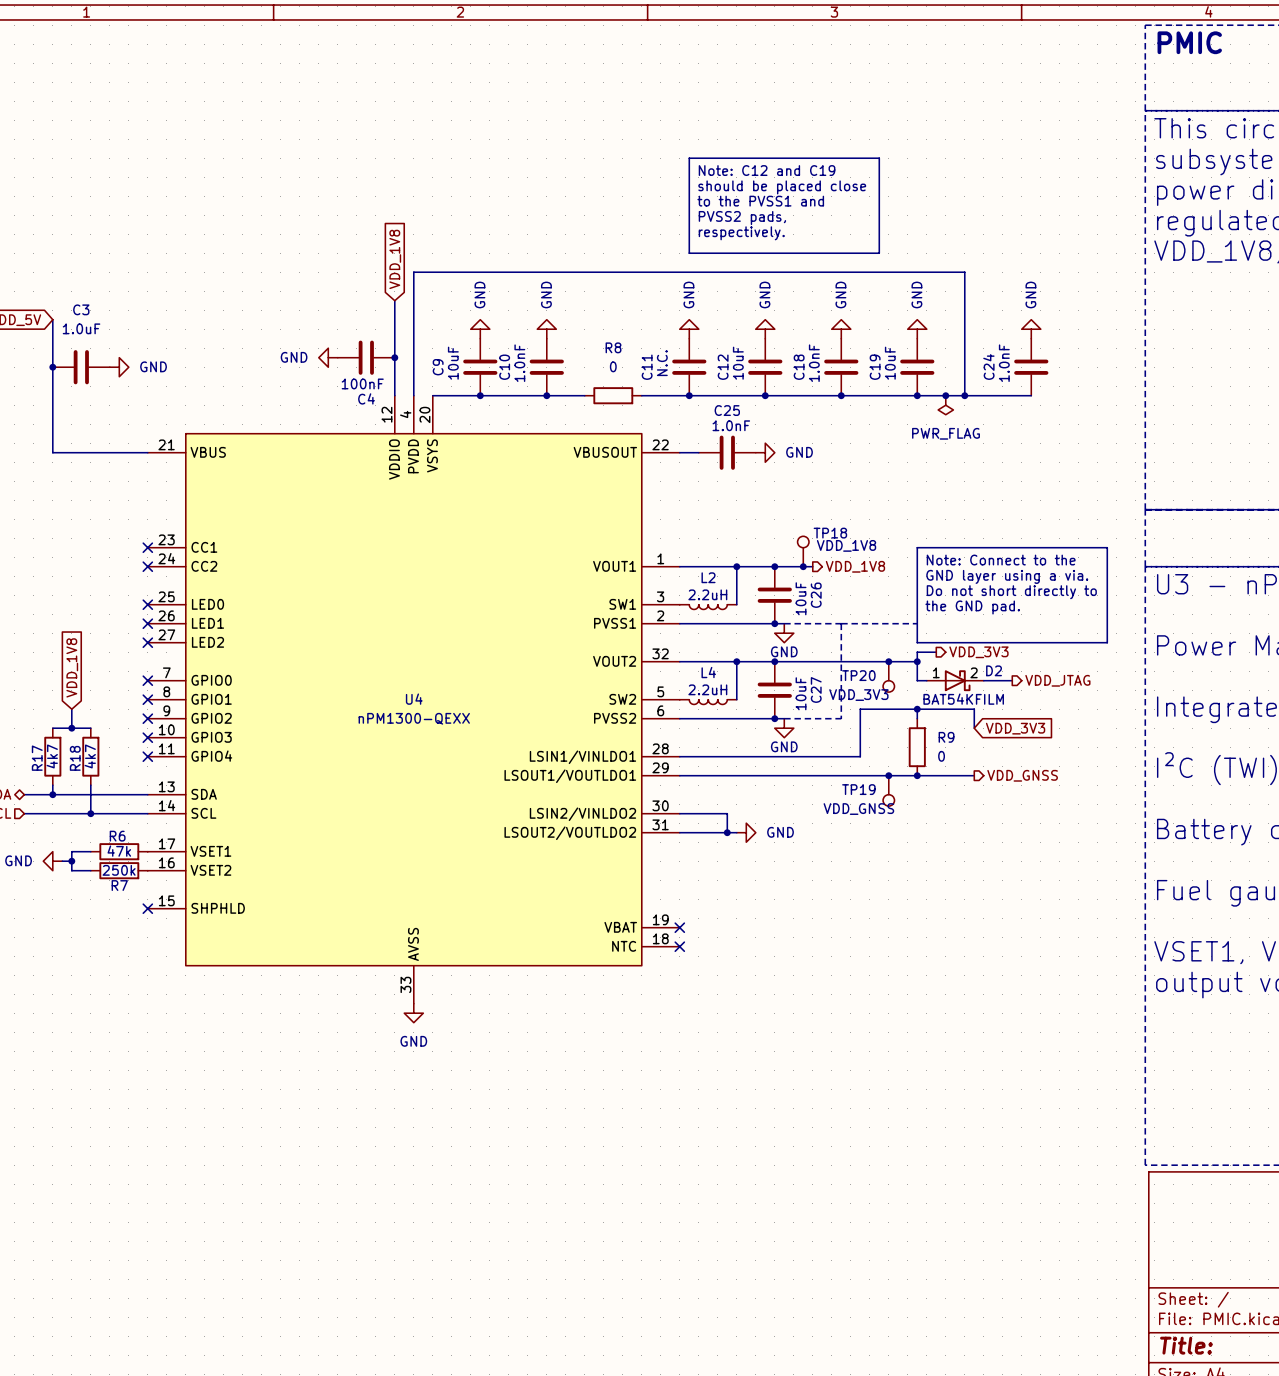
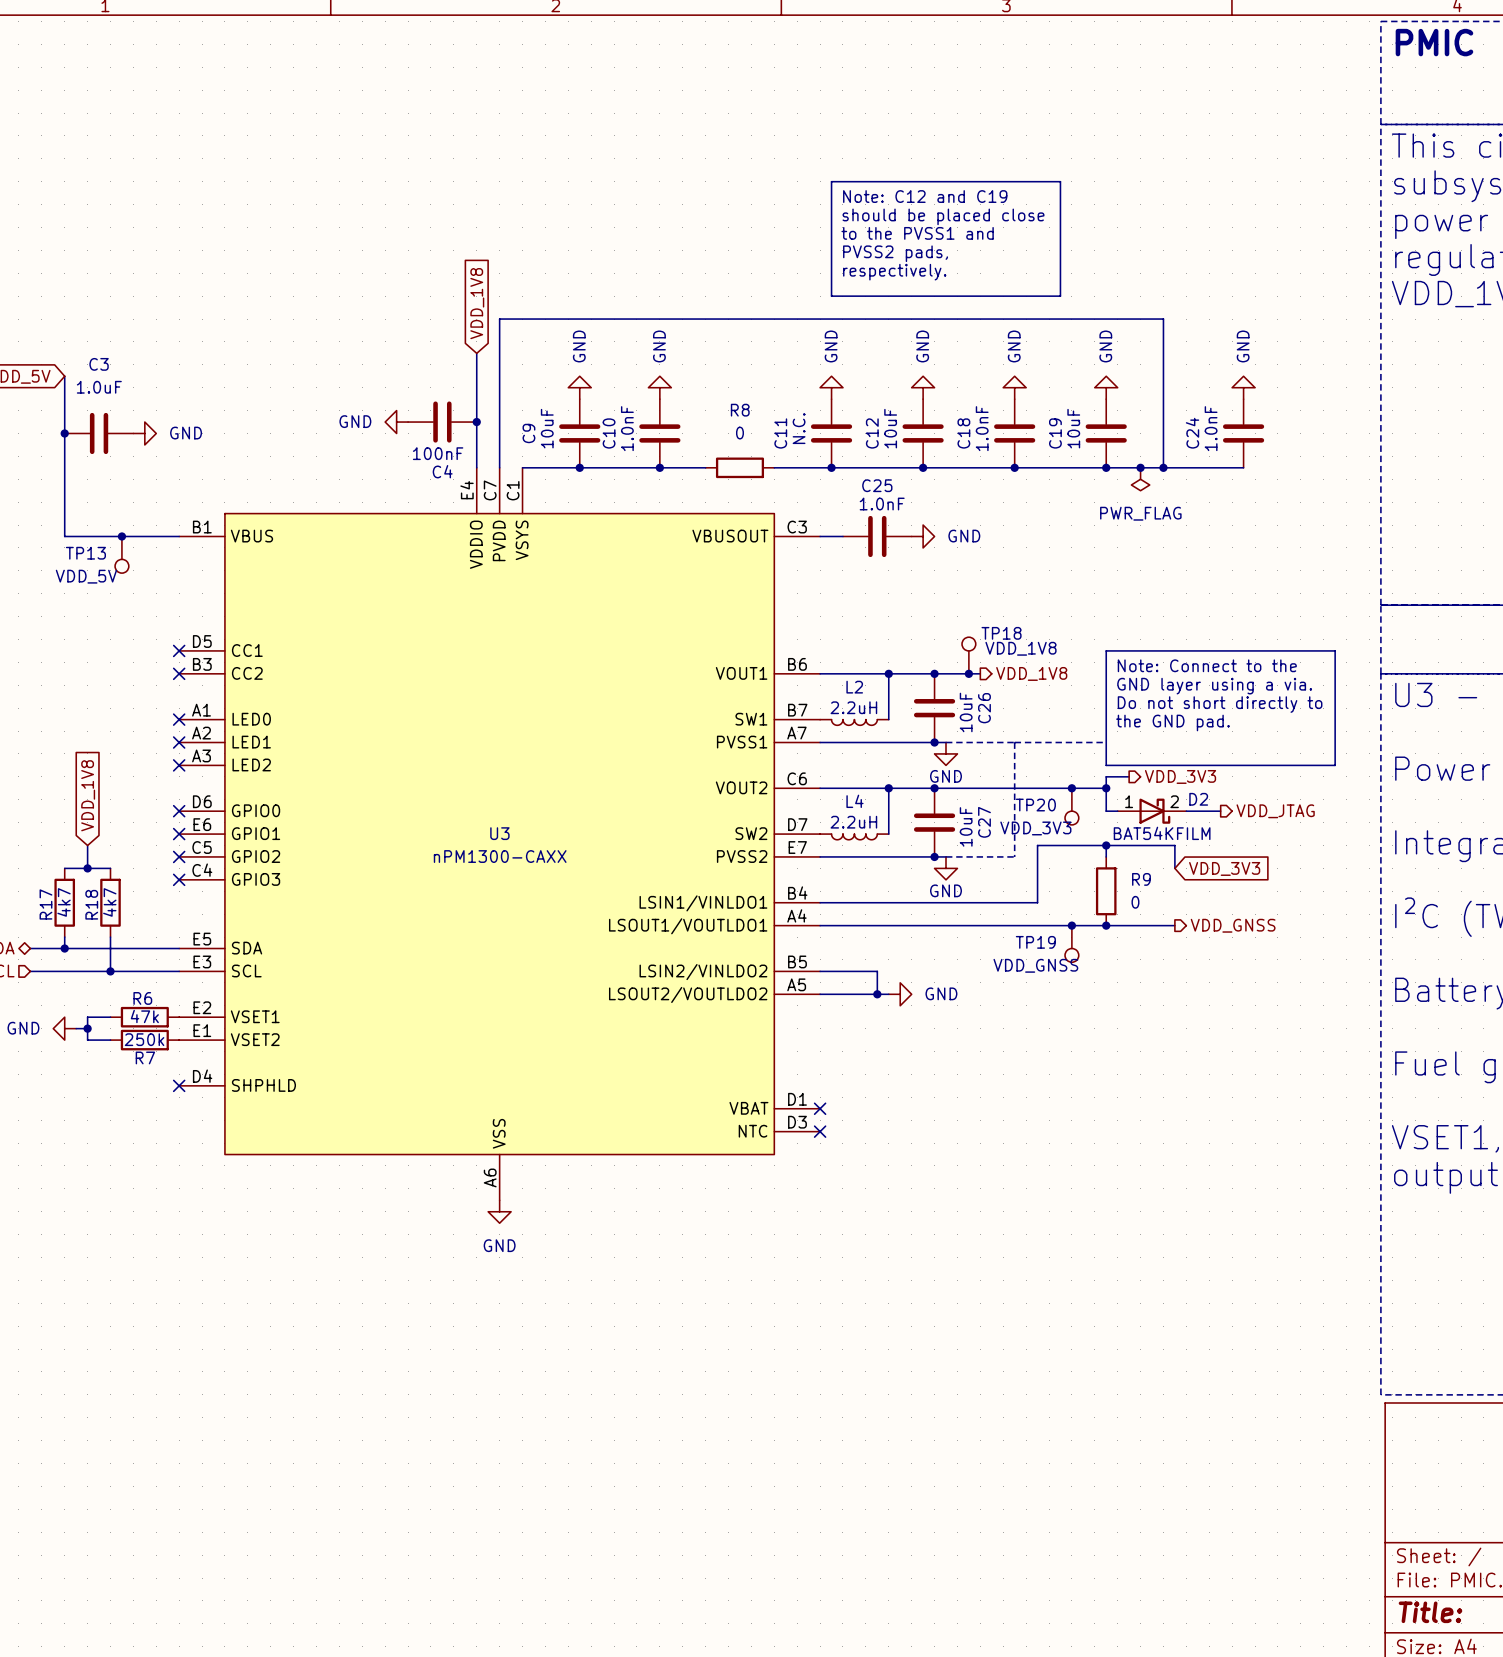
junction: none -> (121, 536)
TP13: none -> VDD_5V (121, 554)
U4: nPM1300-QEXX (413, 699) -> none
U3: none -> nPM1300-CAXX (499, 834)
no-connect mark: (147, 756) -> none

